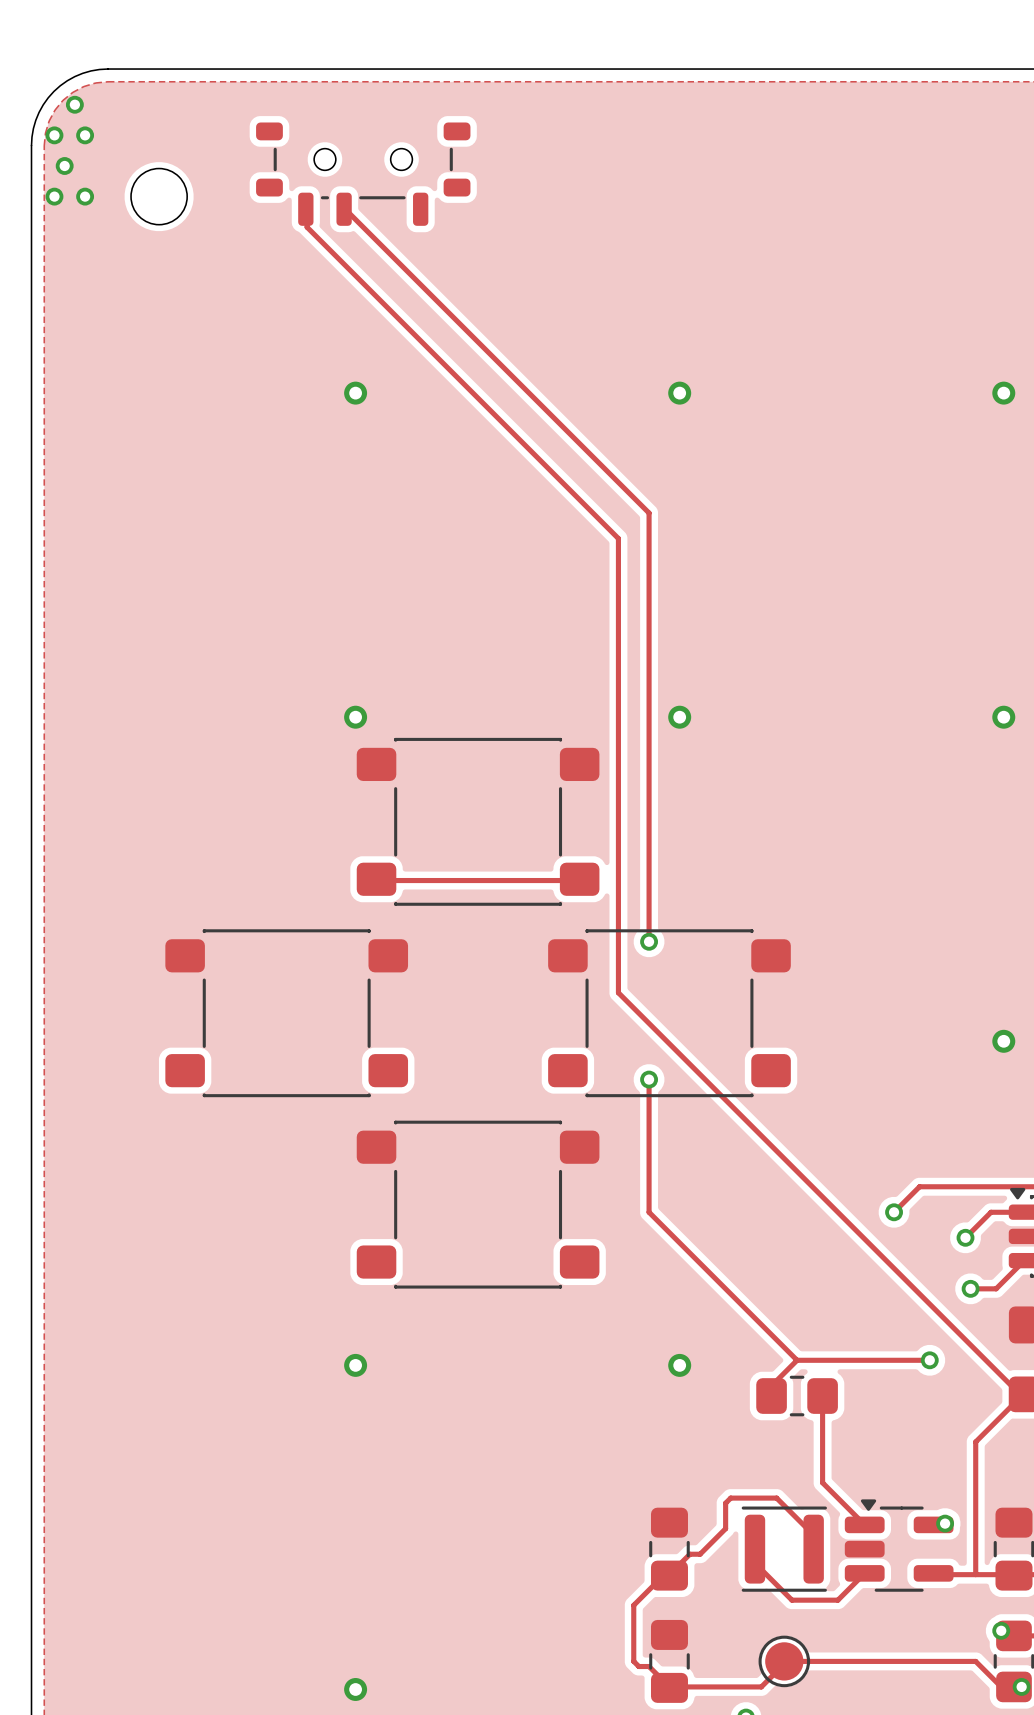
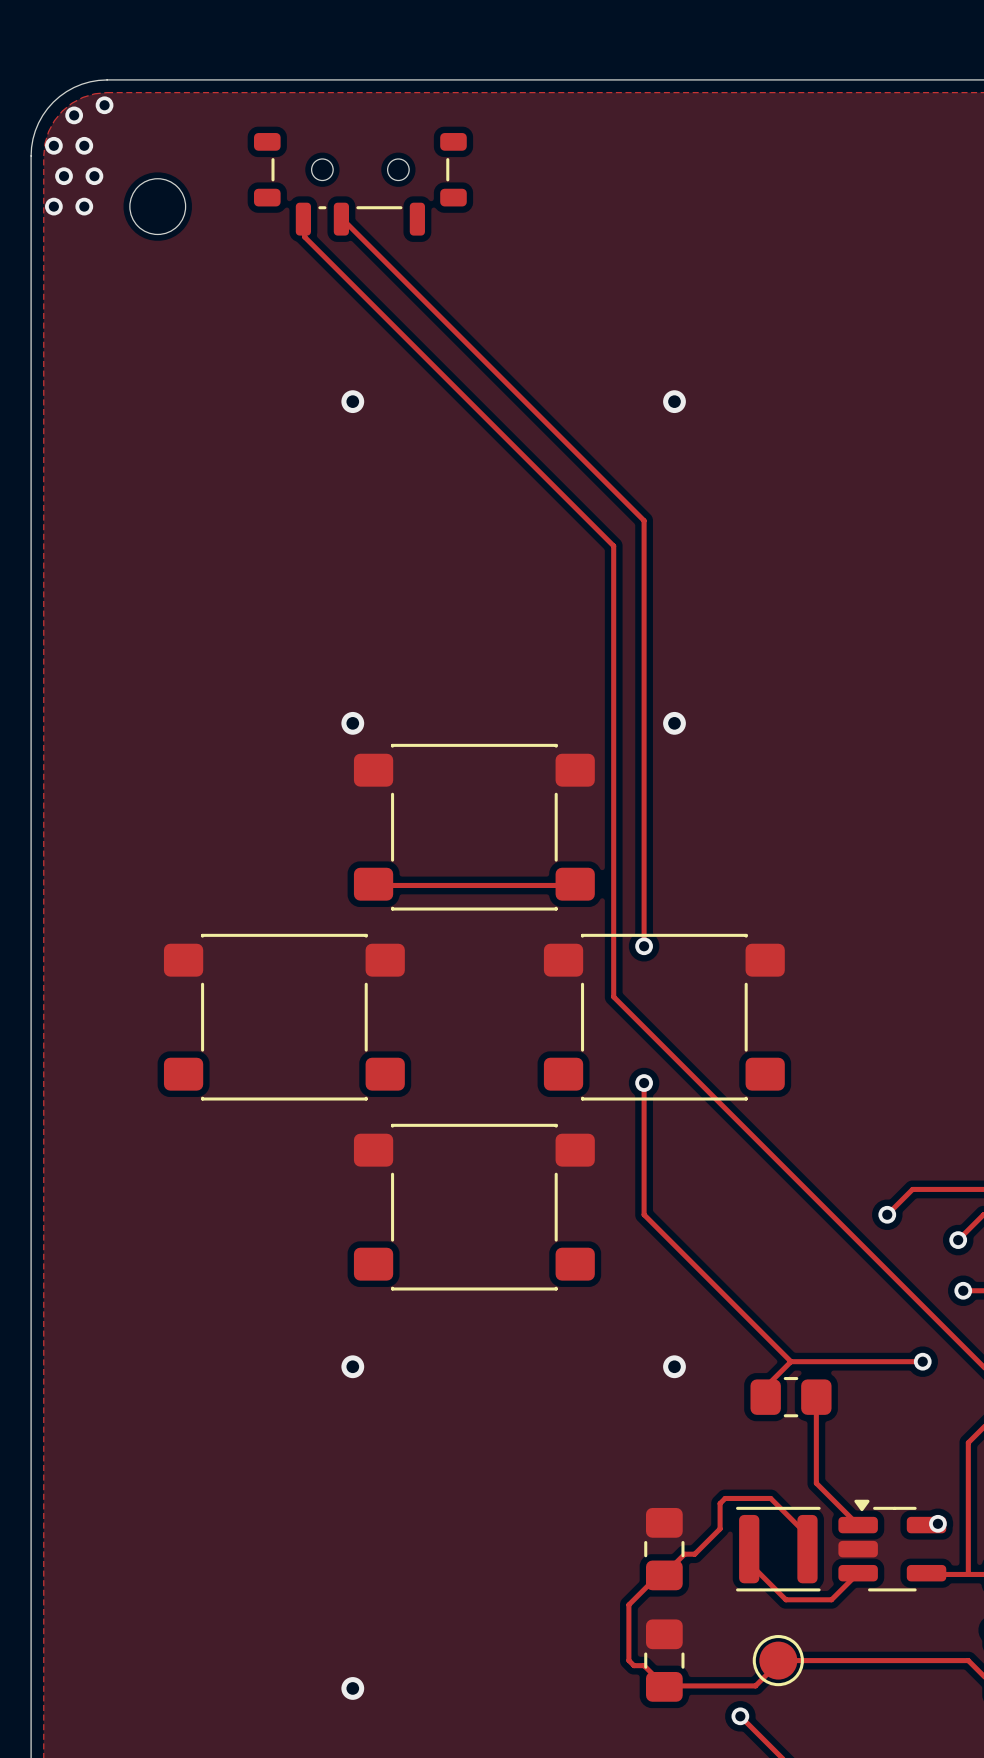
via: none -> (104, 105)
via: none -> (94, 176)

